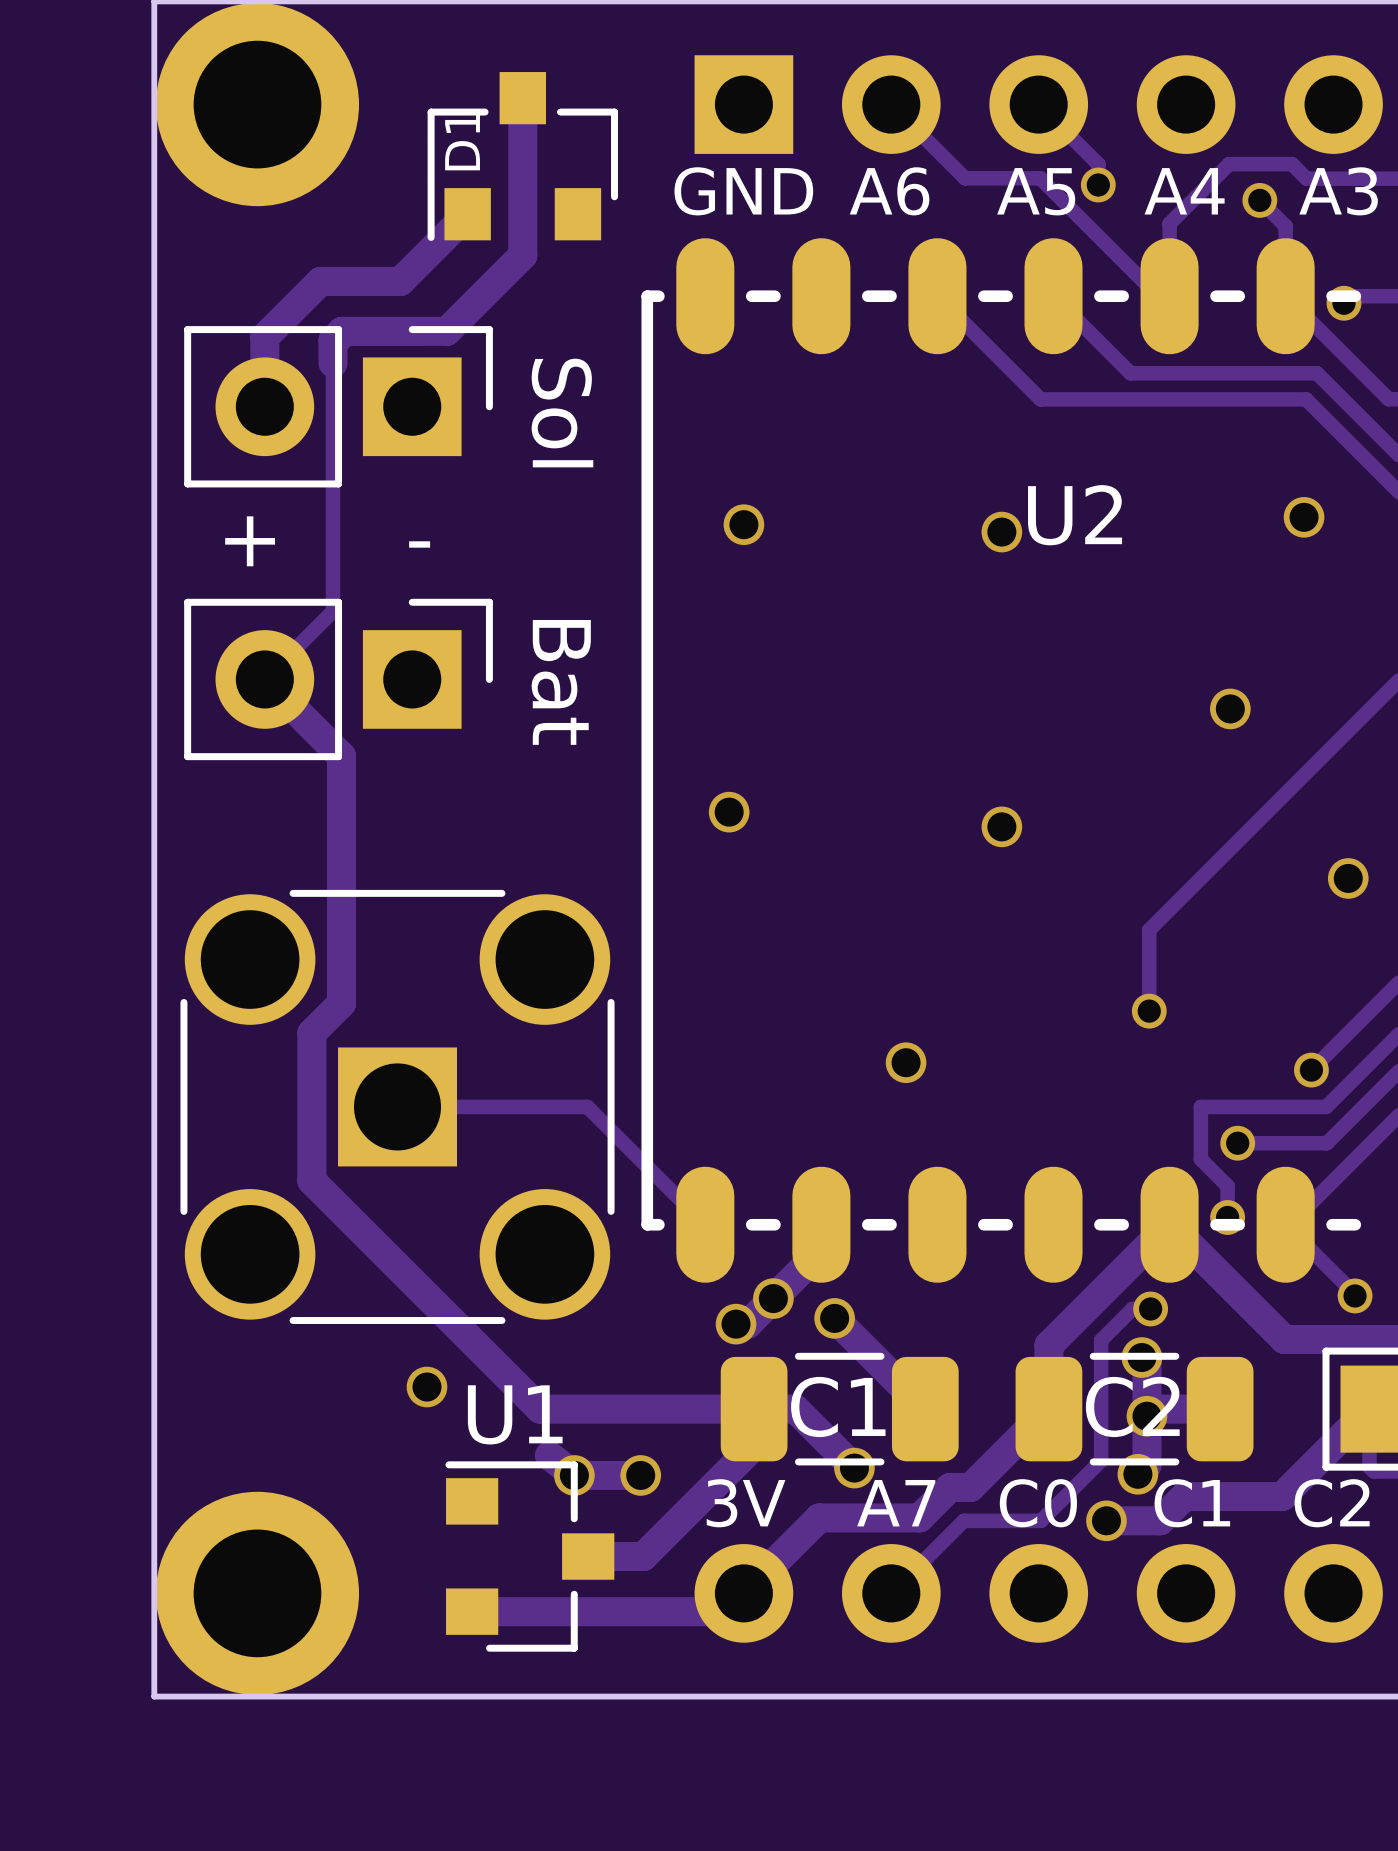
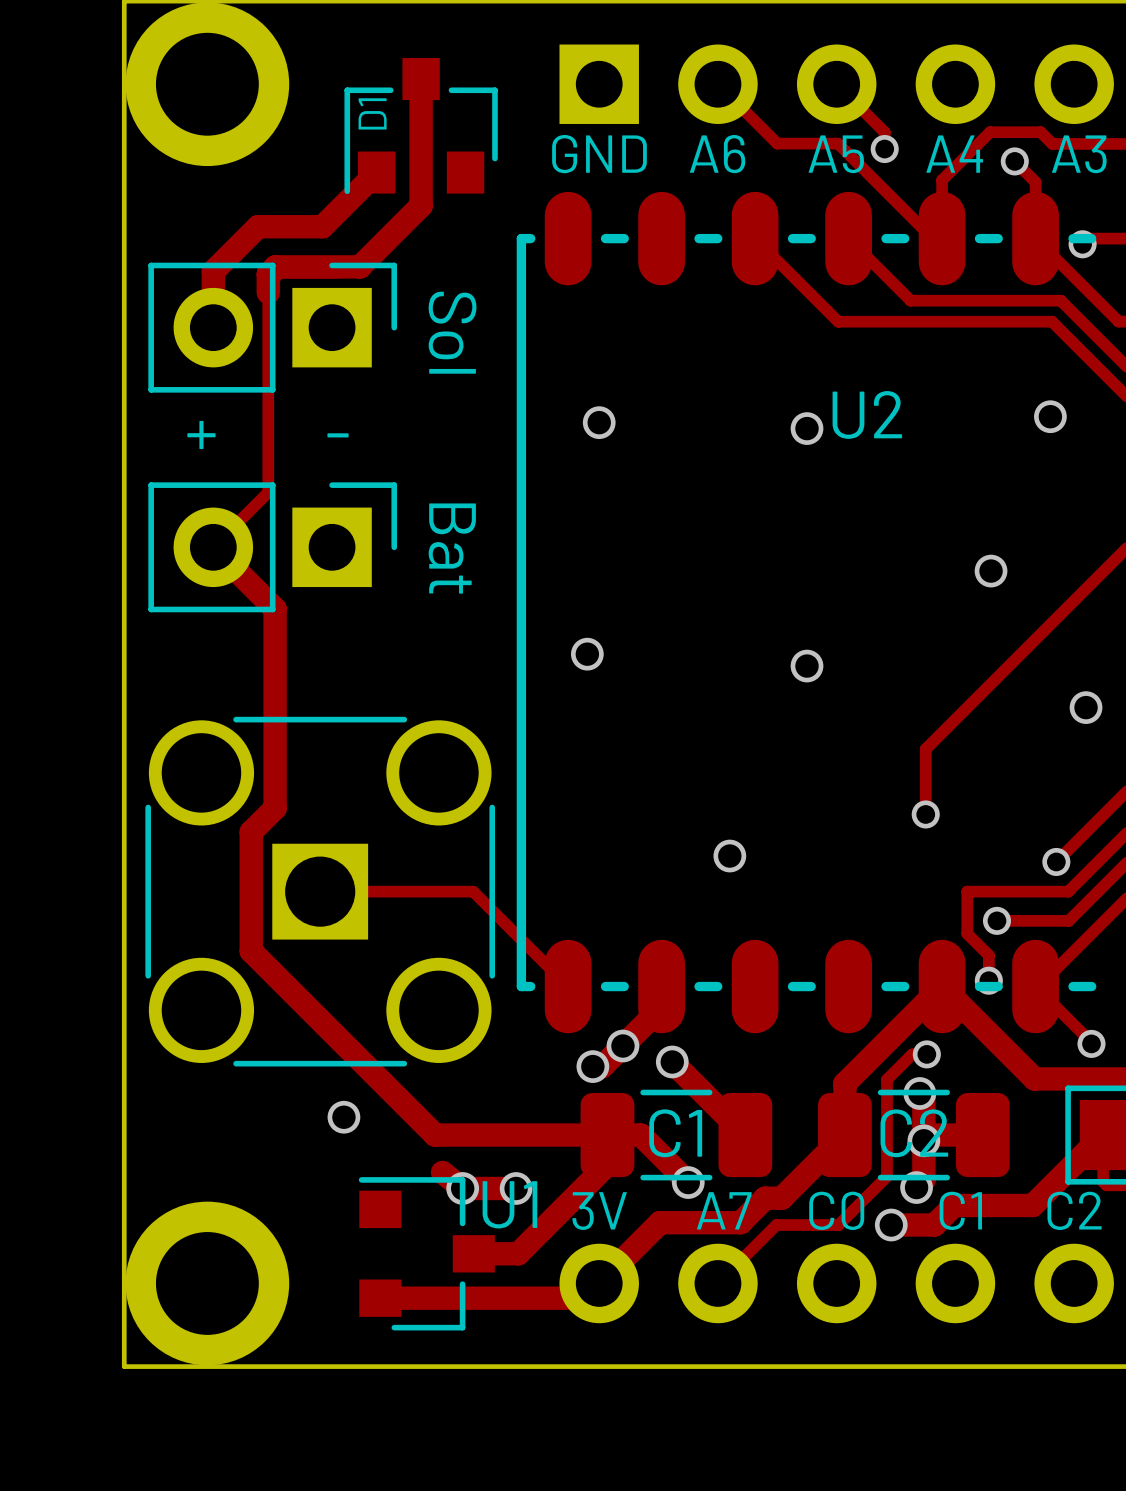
U1 name position: U1 (515, 1414) -> U1 (509, 1204)

